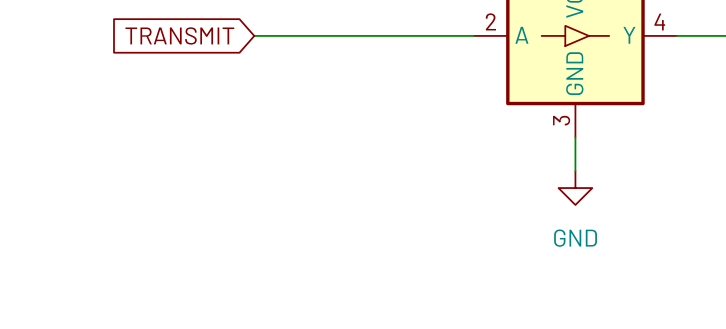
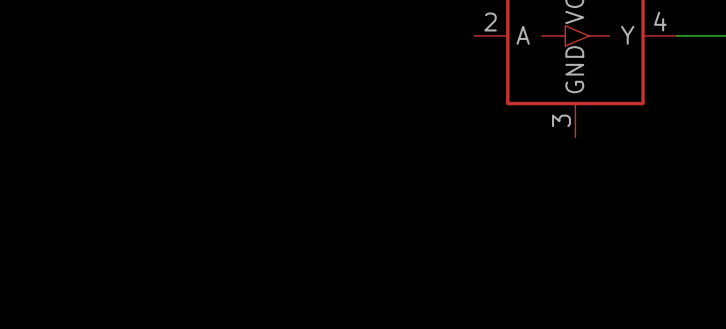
global label: TRANSMIT (179, 35) -> none
wire: (254, 35) (474, 35) -> none
wire: (575, 137) (575, 171) -> none
power symbol: GND (575, 188) -> none

